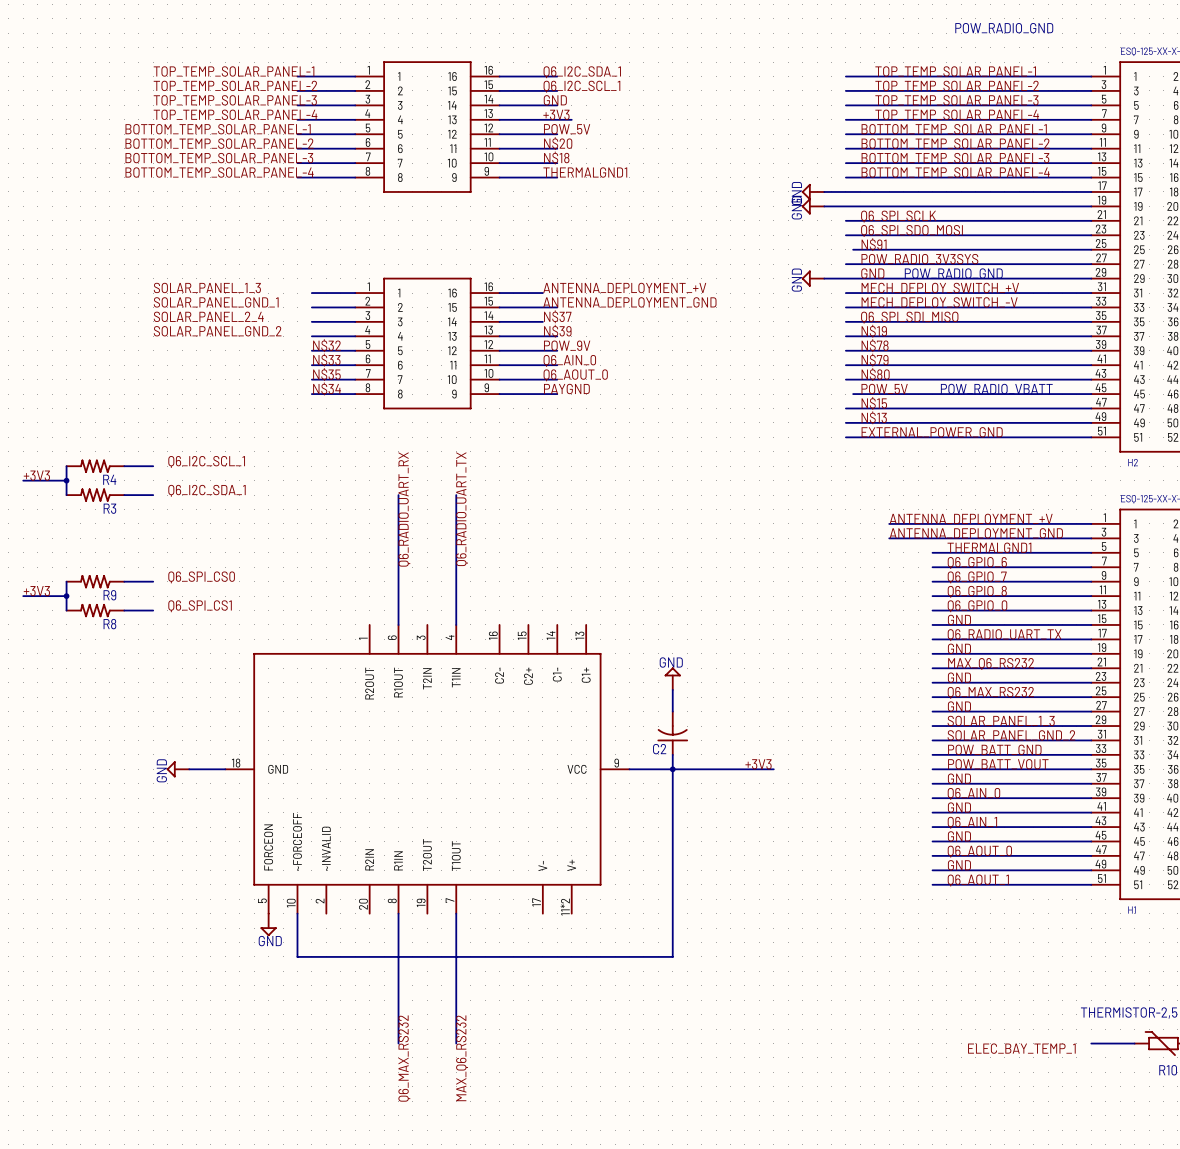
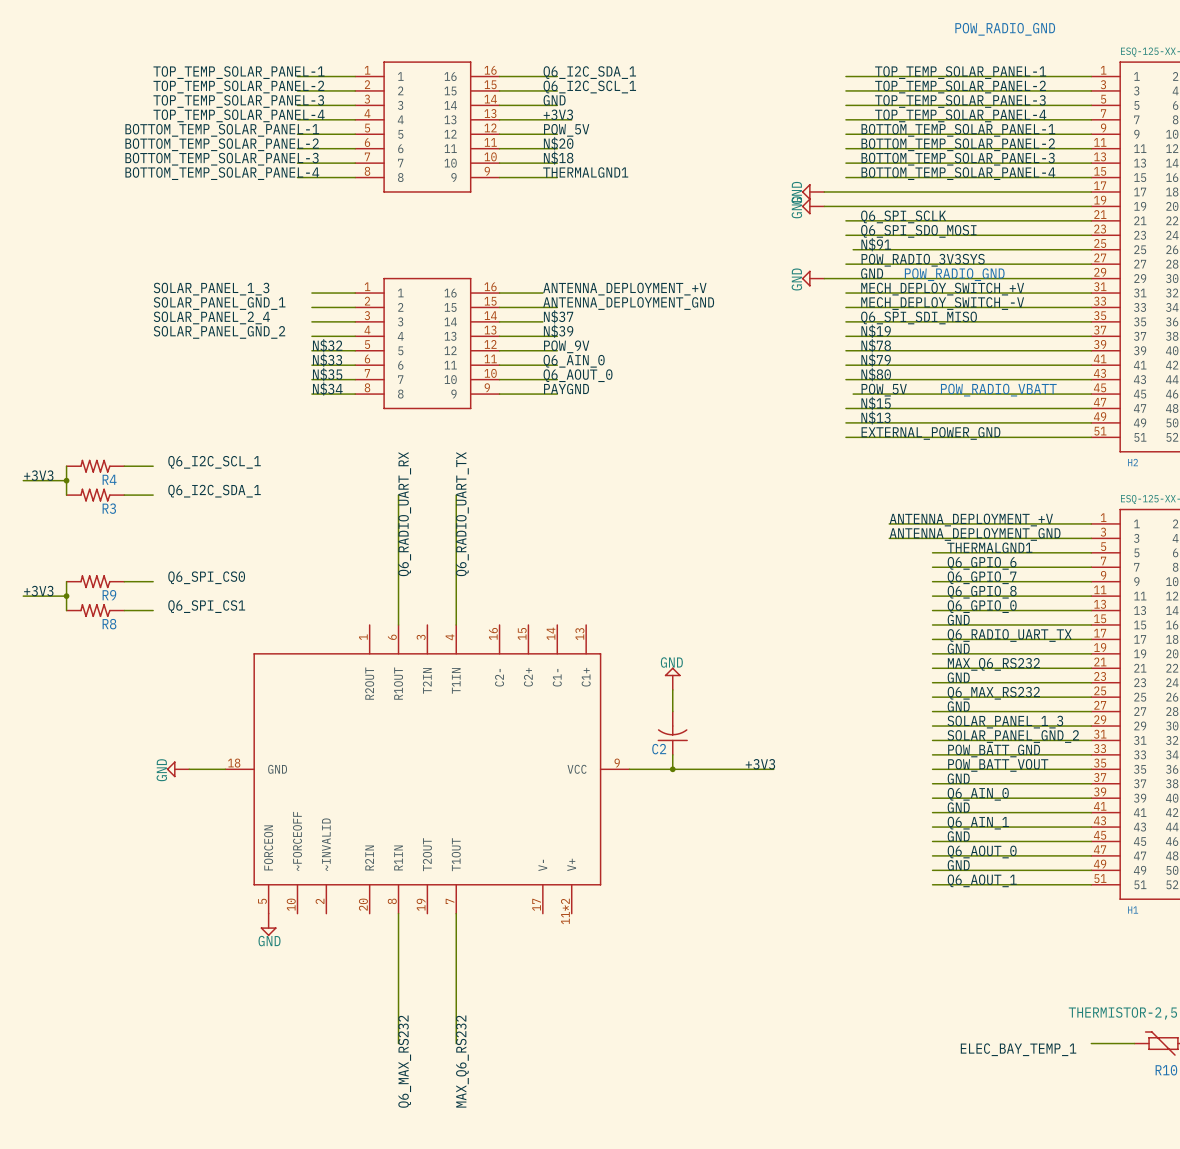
wire: (672, 769) (672, 956) (297, 956) (297, 913) -> none

